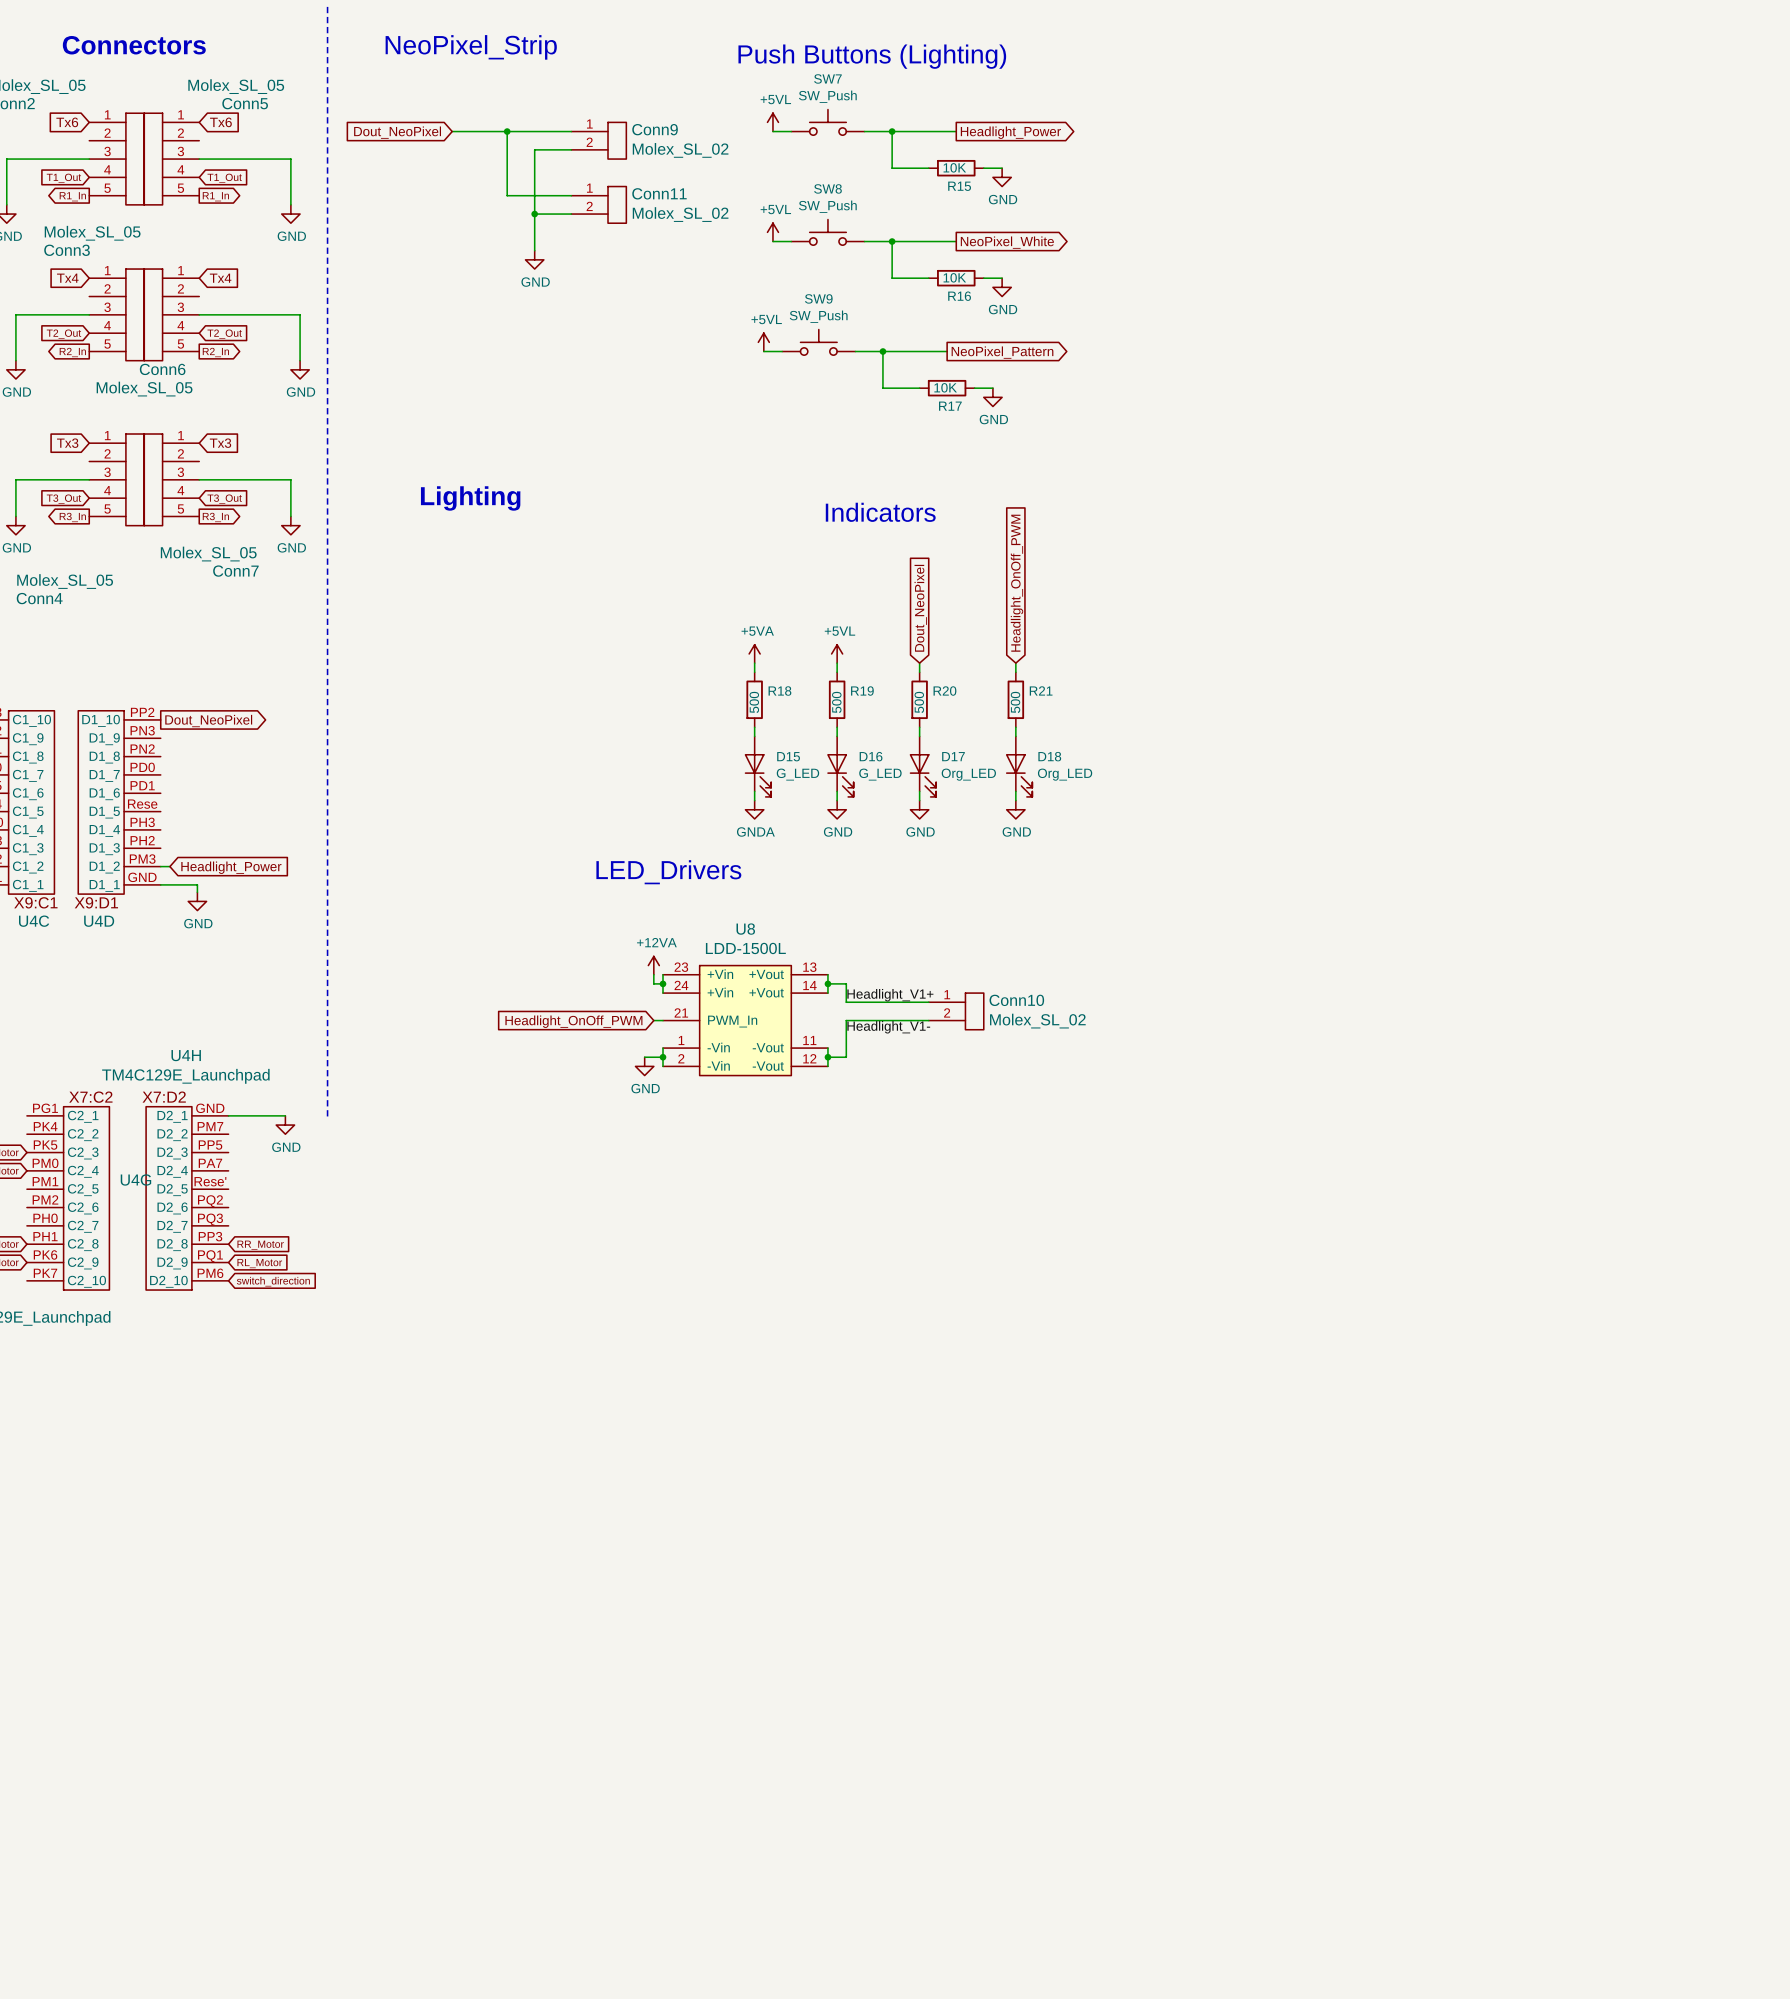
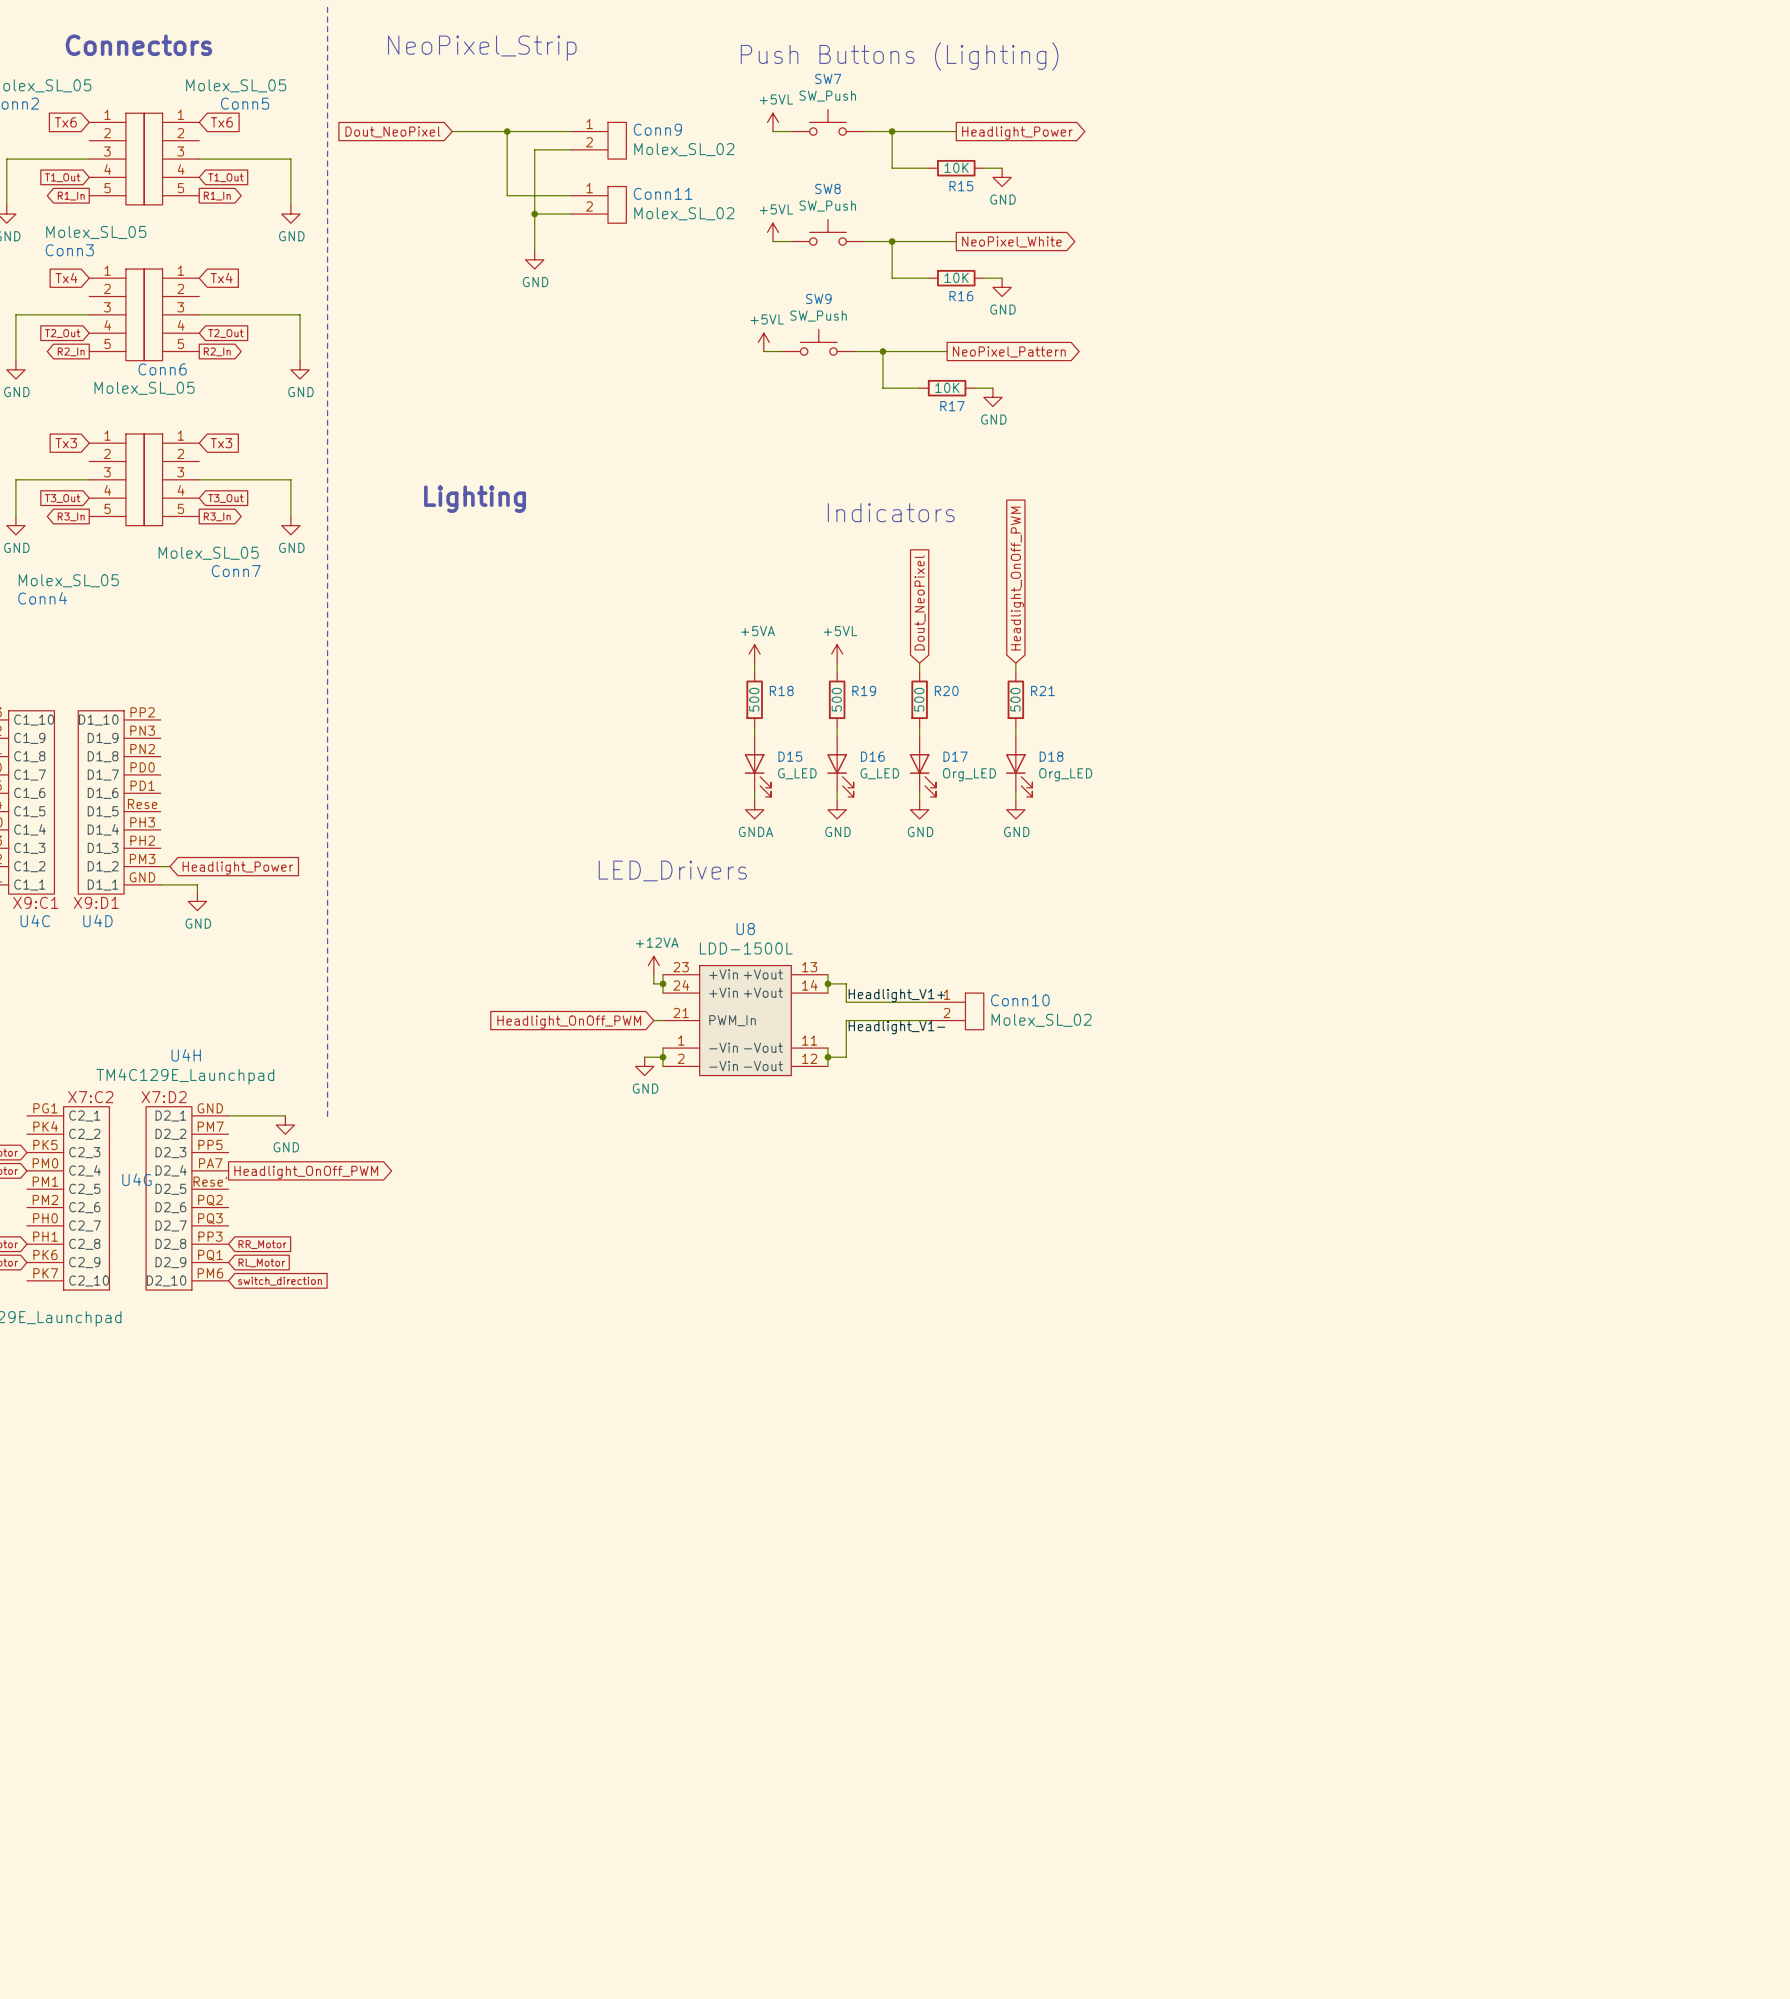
global label: Dout_NeoPixel (208, 721) -> none
global label: none -> Headlight_OnOff_PWM (306, 1172)

